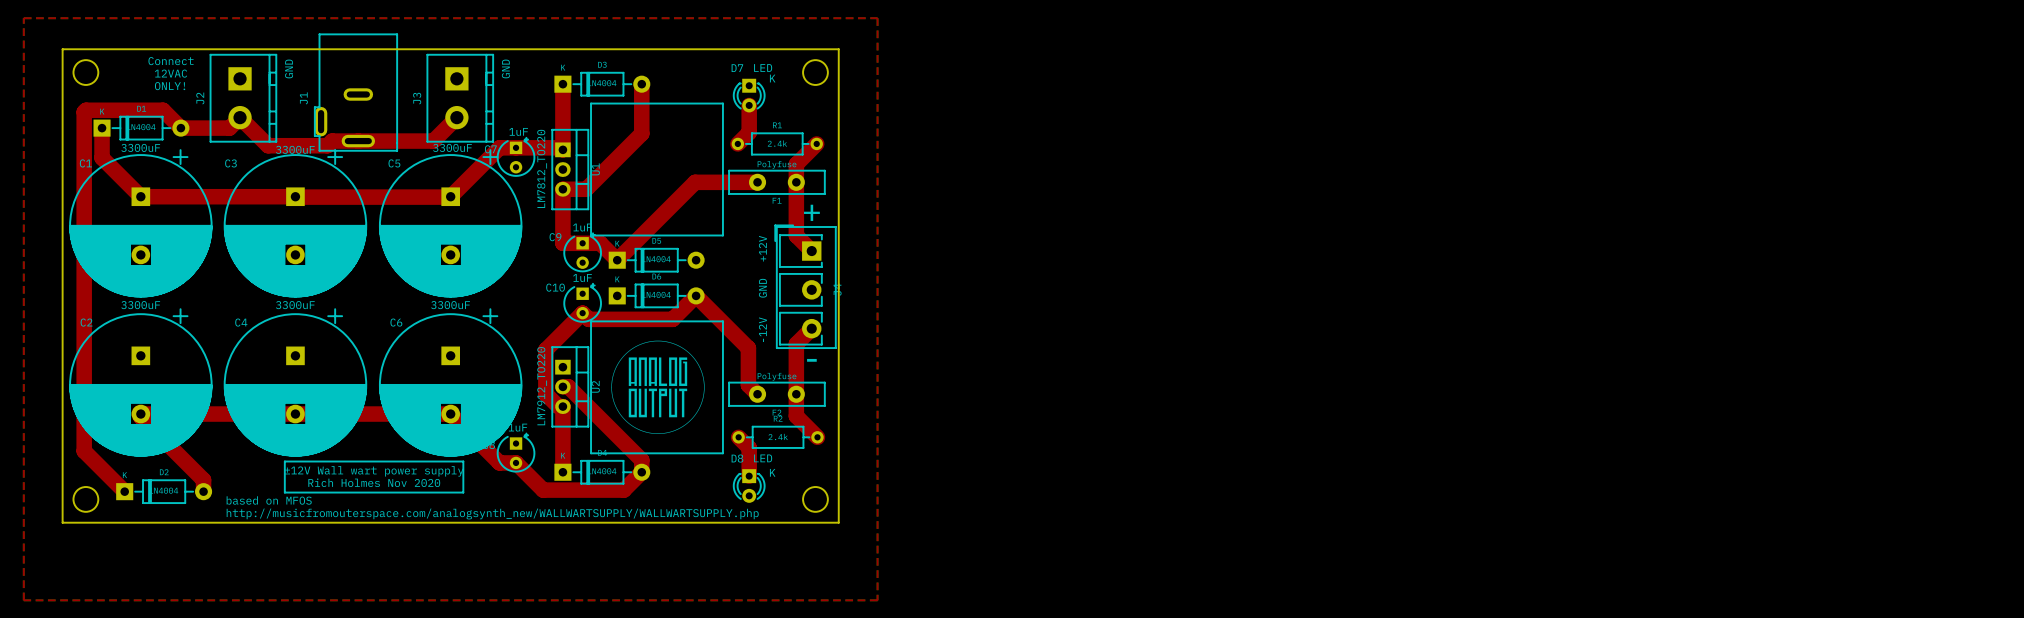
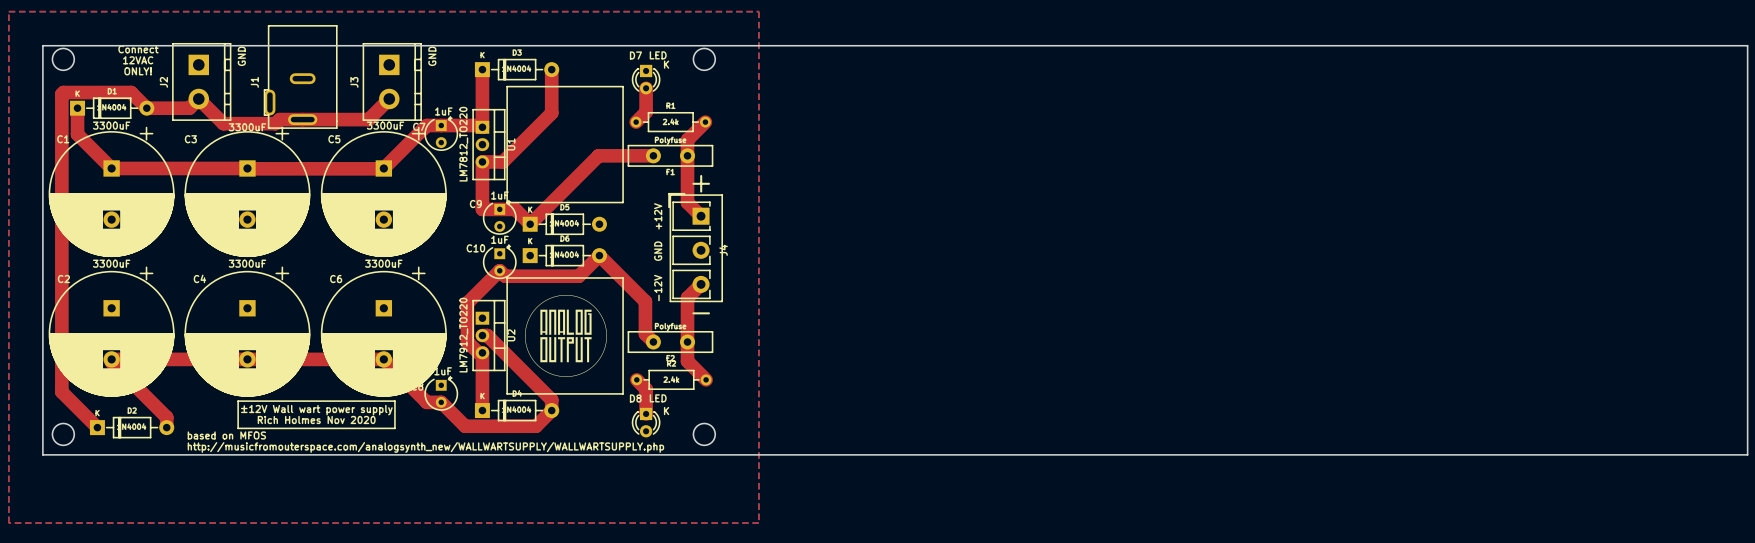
board edge: (62, 57) (62, 49) (838, 49) (838, 522) -> (42, 45) (1747, 45) (1747, 454) (724, 454)

